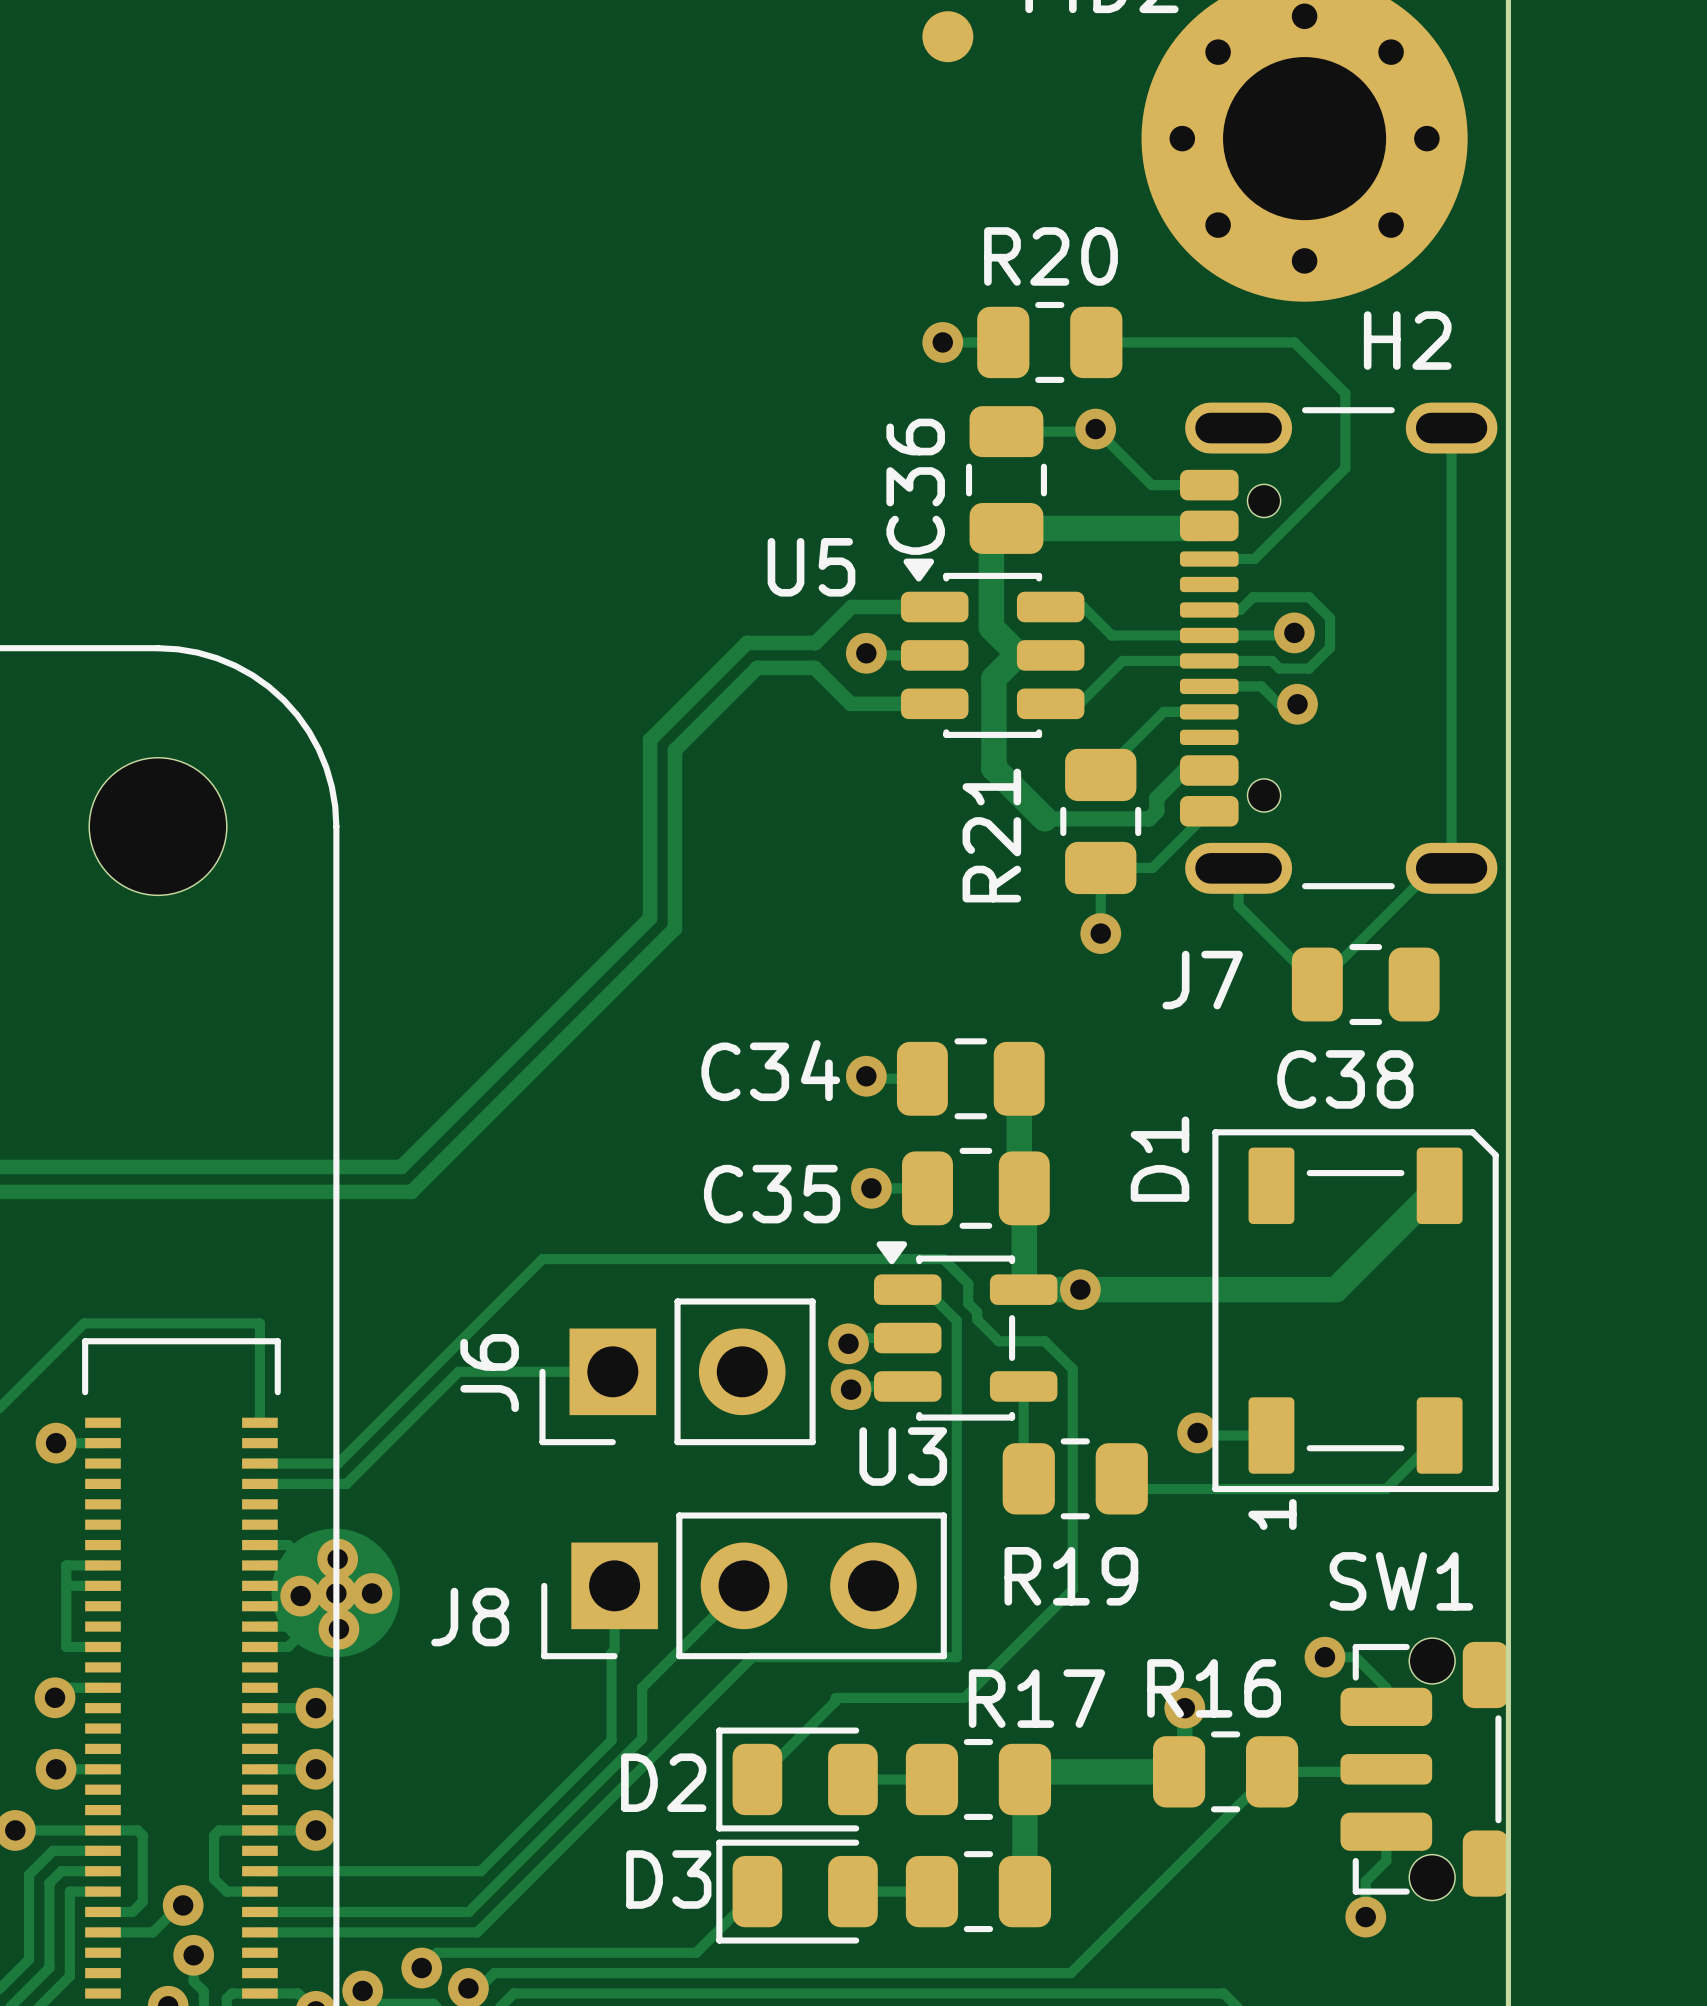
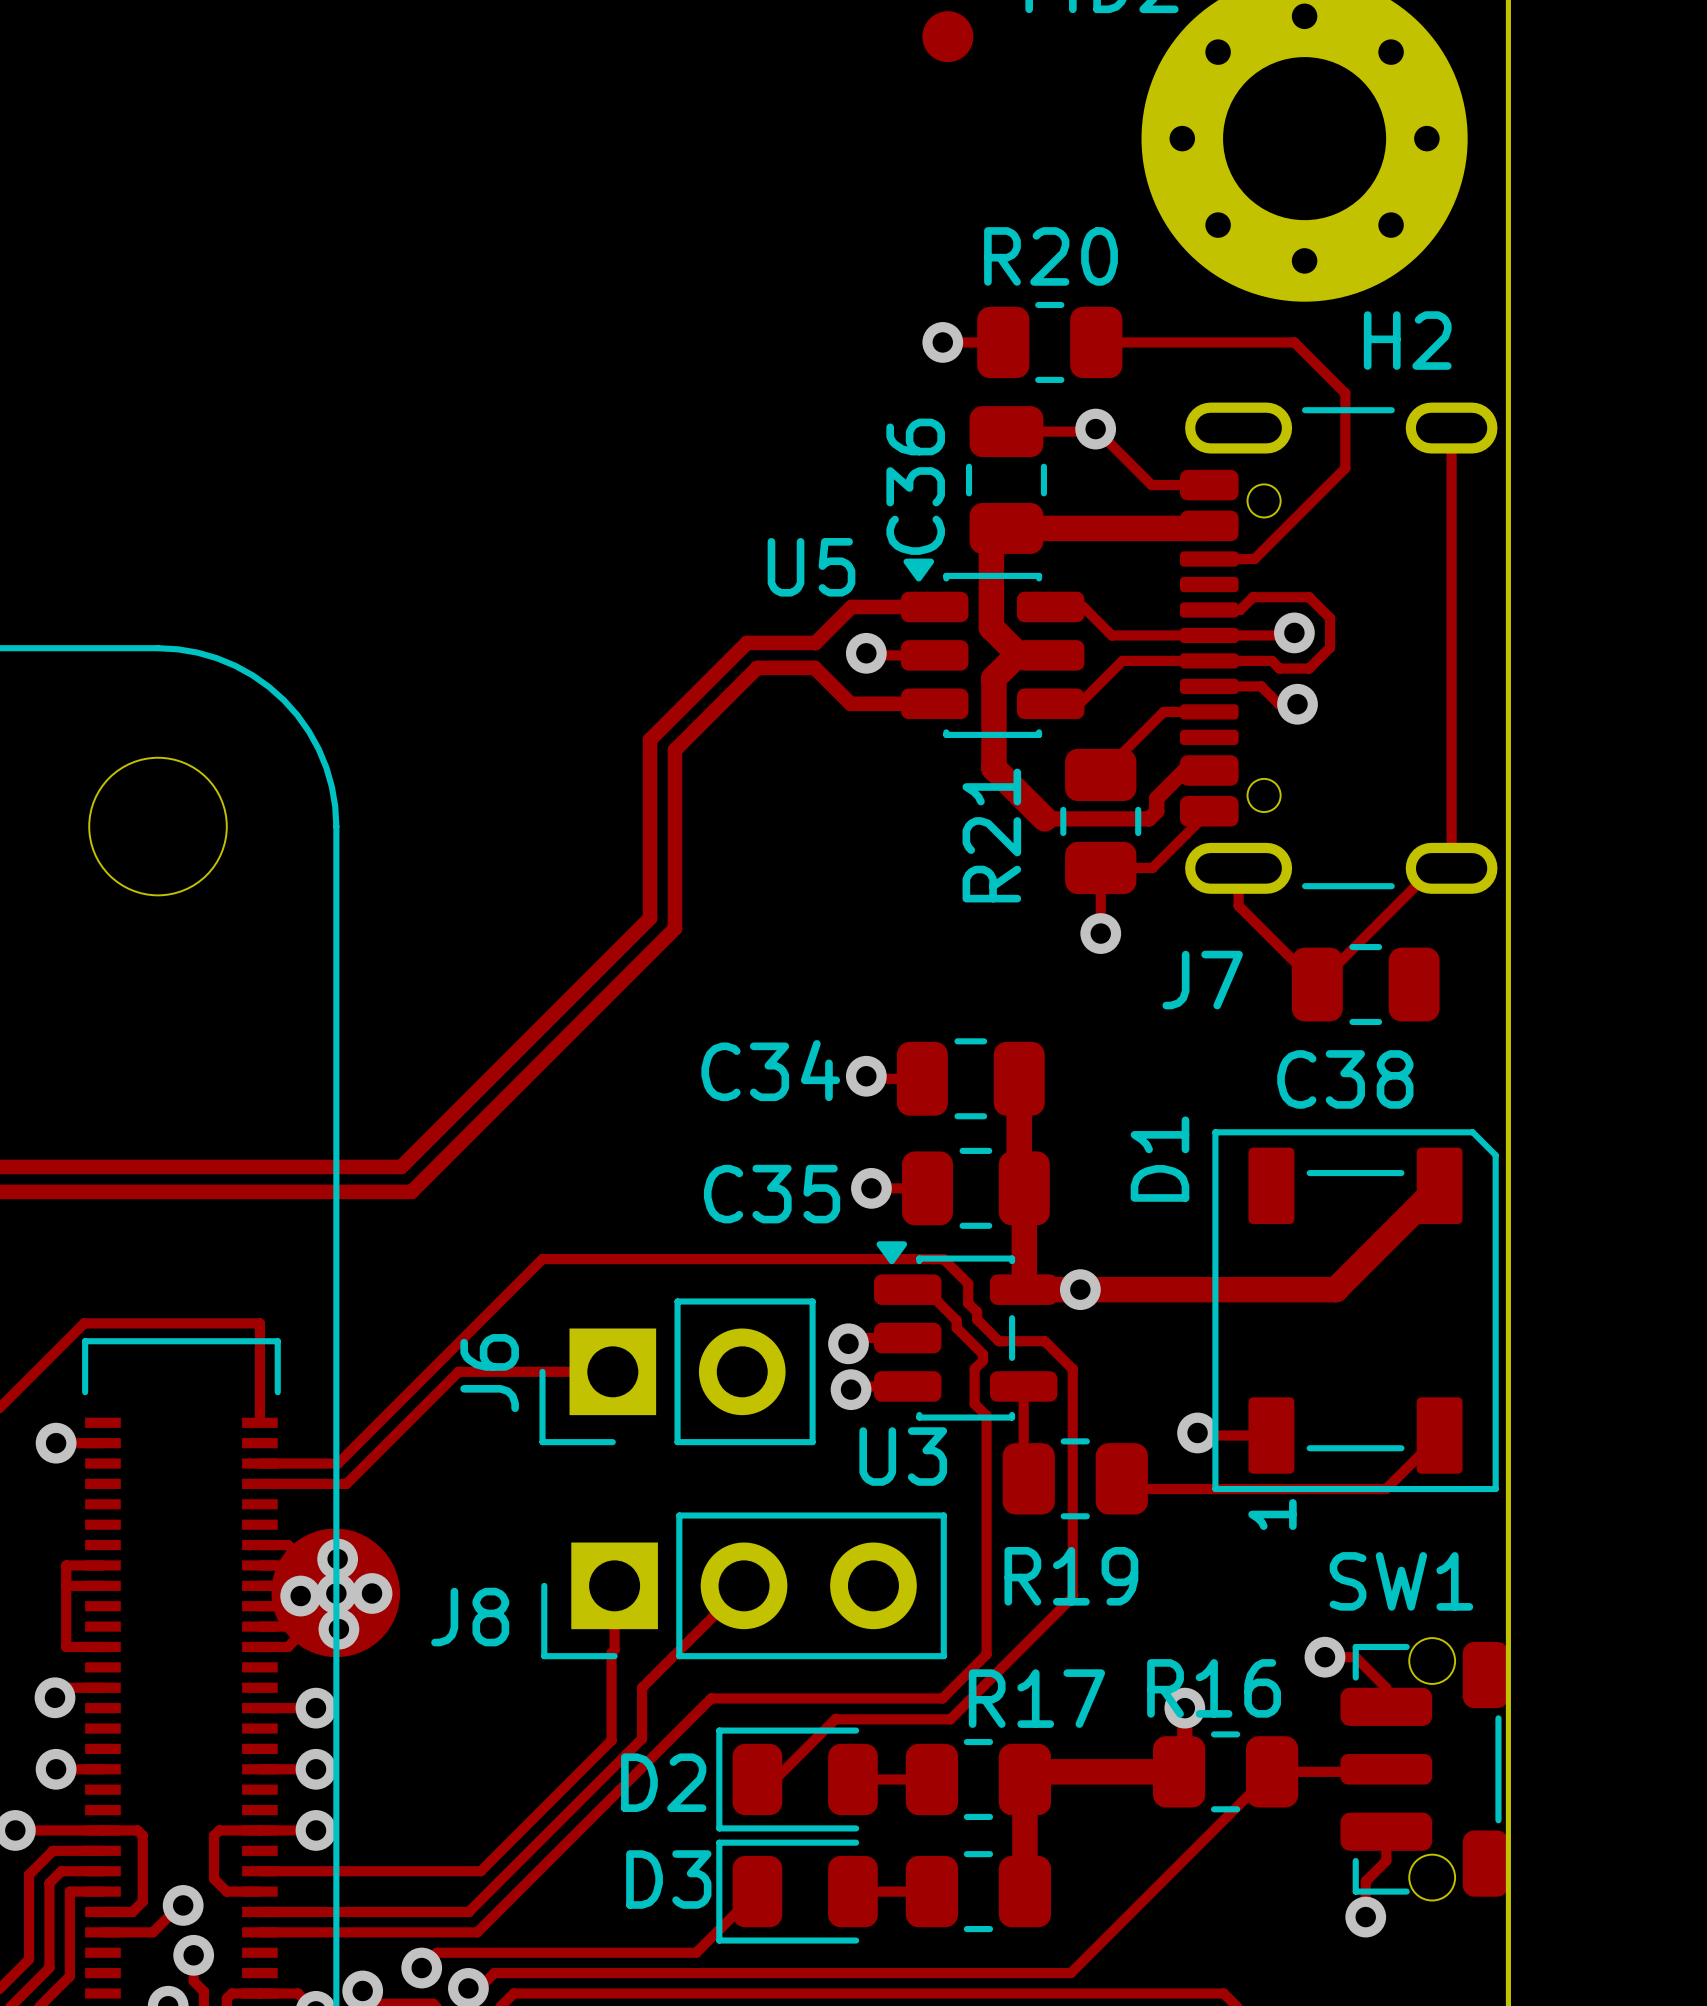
track: (956, 1328) (956, 1657) (752, 1657) (711, 1698) -> (956, 1328) (983, 1354) (983, 1360) (974, 1369) (974, 1403) (986, 1415) (986, 1654) (942, 1698) (711, 1698)
track: (1072, 1589) (964, 1697) (835, 1697) (835, 1701) (757, 1779) -> (1072, 1589) (1072, 1597) (950, 1719) (835, 1719)
track: none -> (835, 1718) (775, 1779) (757, 1779)

